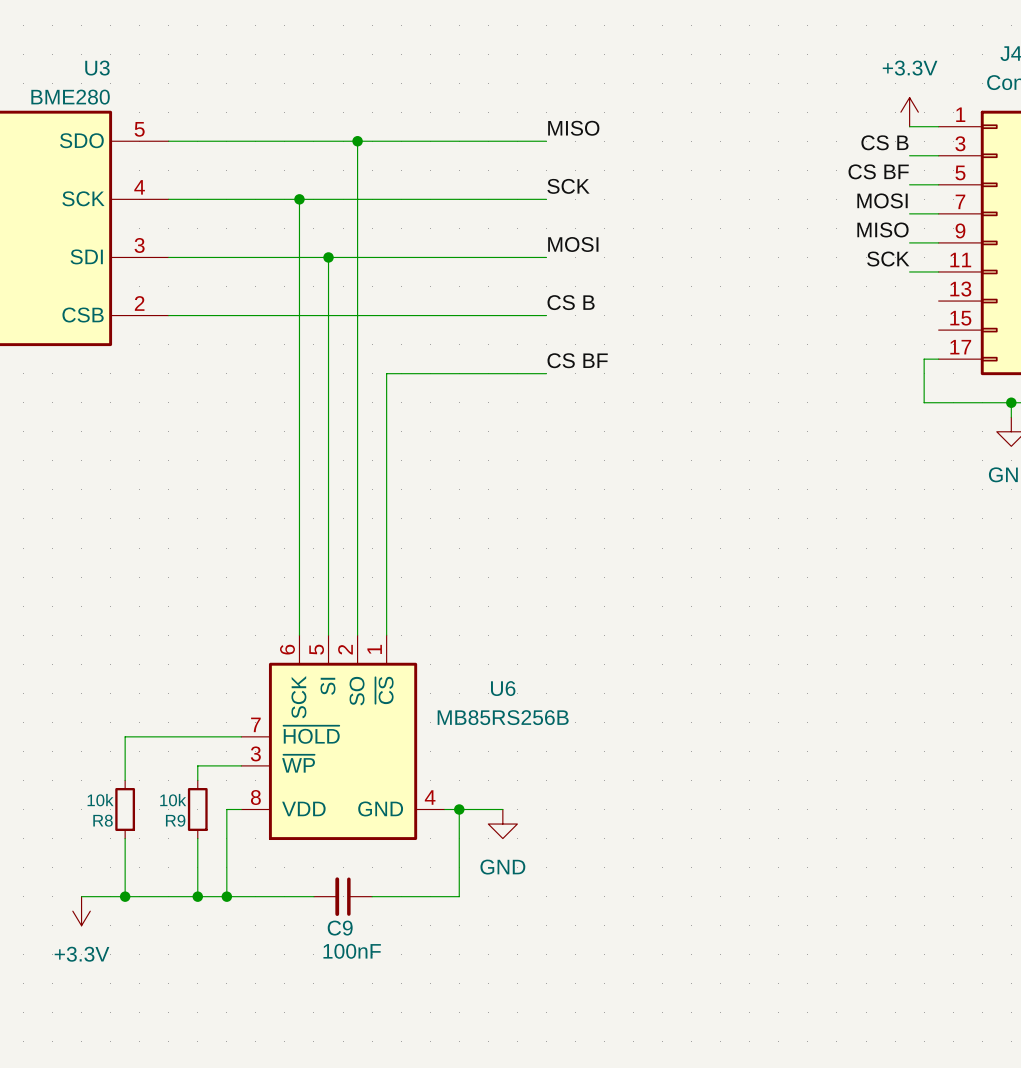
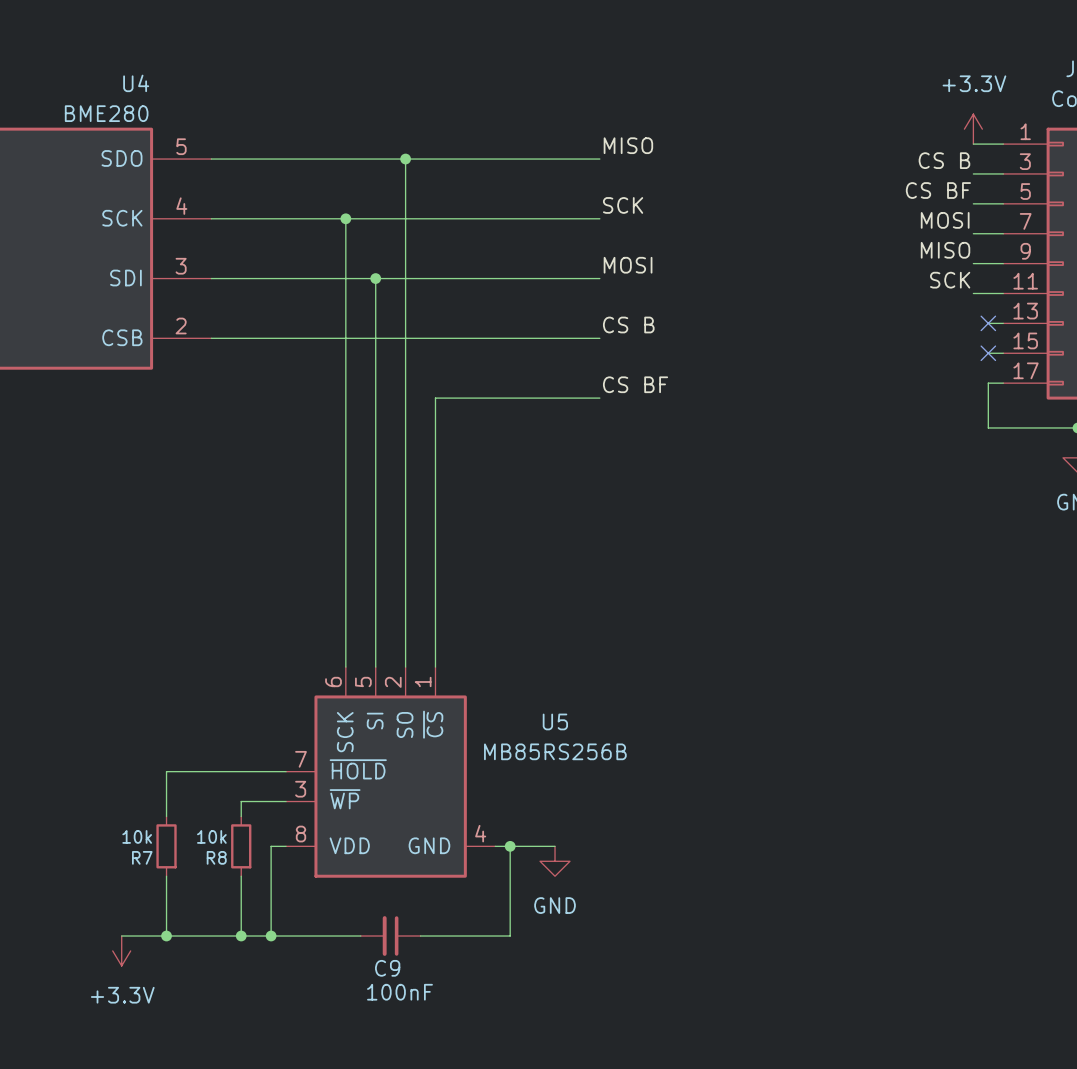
U3 name: U3 (97, 68) -> U4 (136, 83)
wire: none -> (988, 323) (1003, 323)
no-connect mark: none -> (988, 323)
wire: none -> (988, 353) (1003, 353)
no-connect mark: none -> (988, 353)
U6 name: U6 (503, 688) -> U5 (555, 721)
R8 name: R8 (103, 820) -> R7 (142, 857)
R9 name: R9 (175, 820) -> R8 (216, 857)

